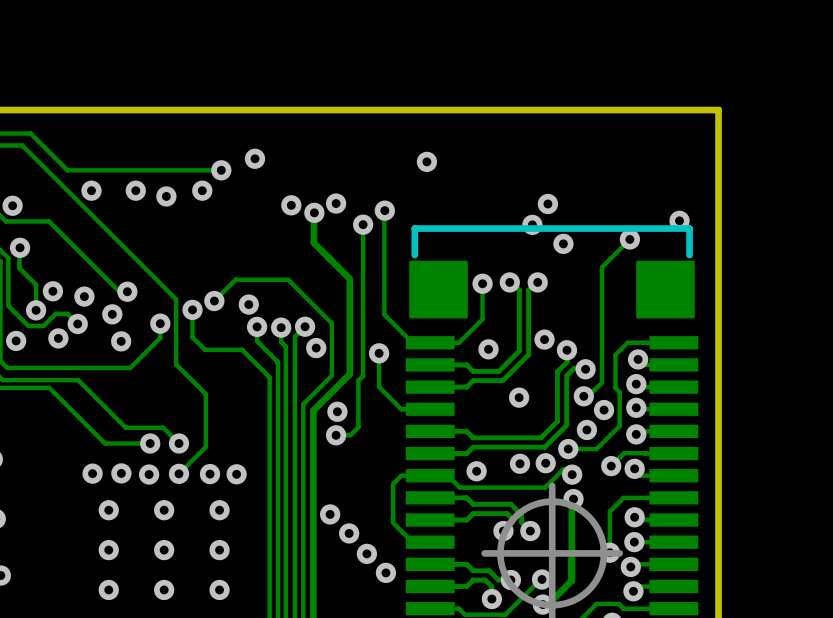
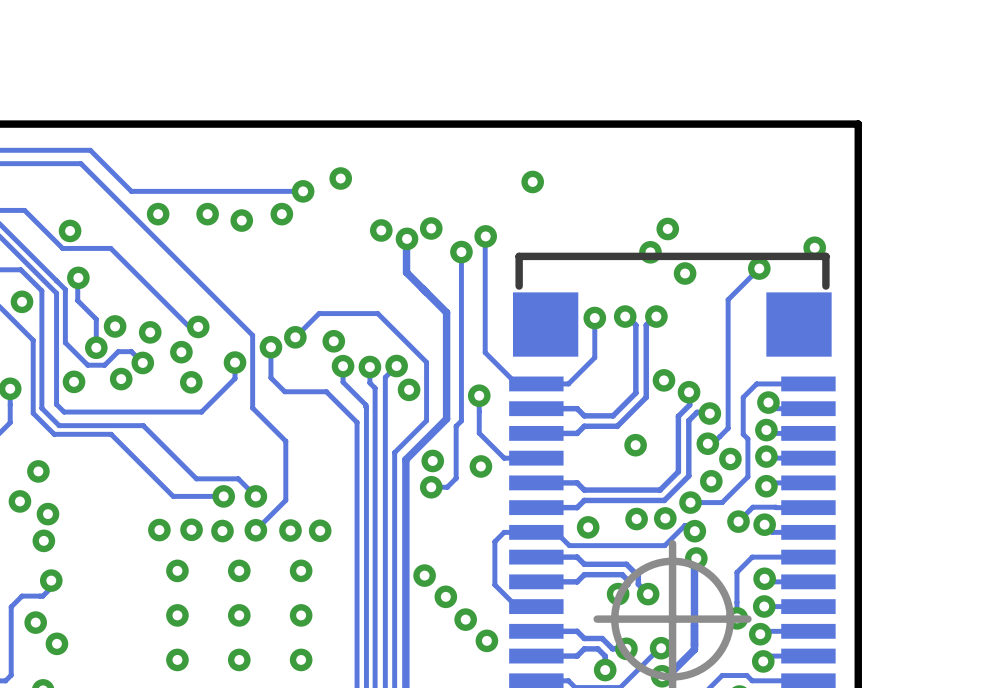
via position: (488, 349) -> (480, 466)

